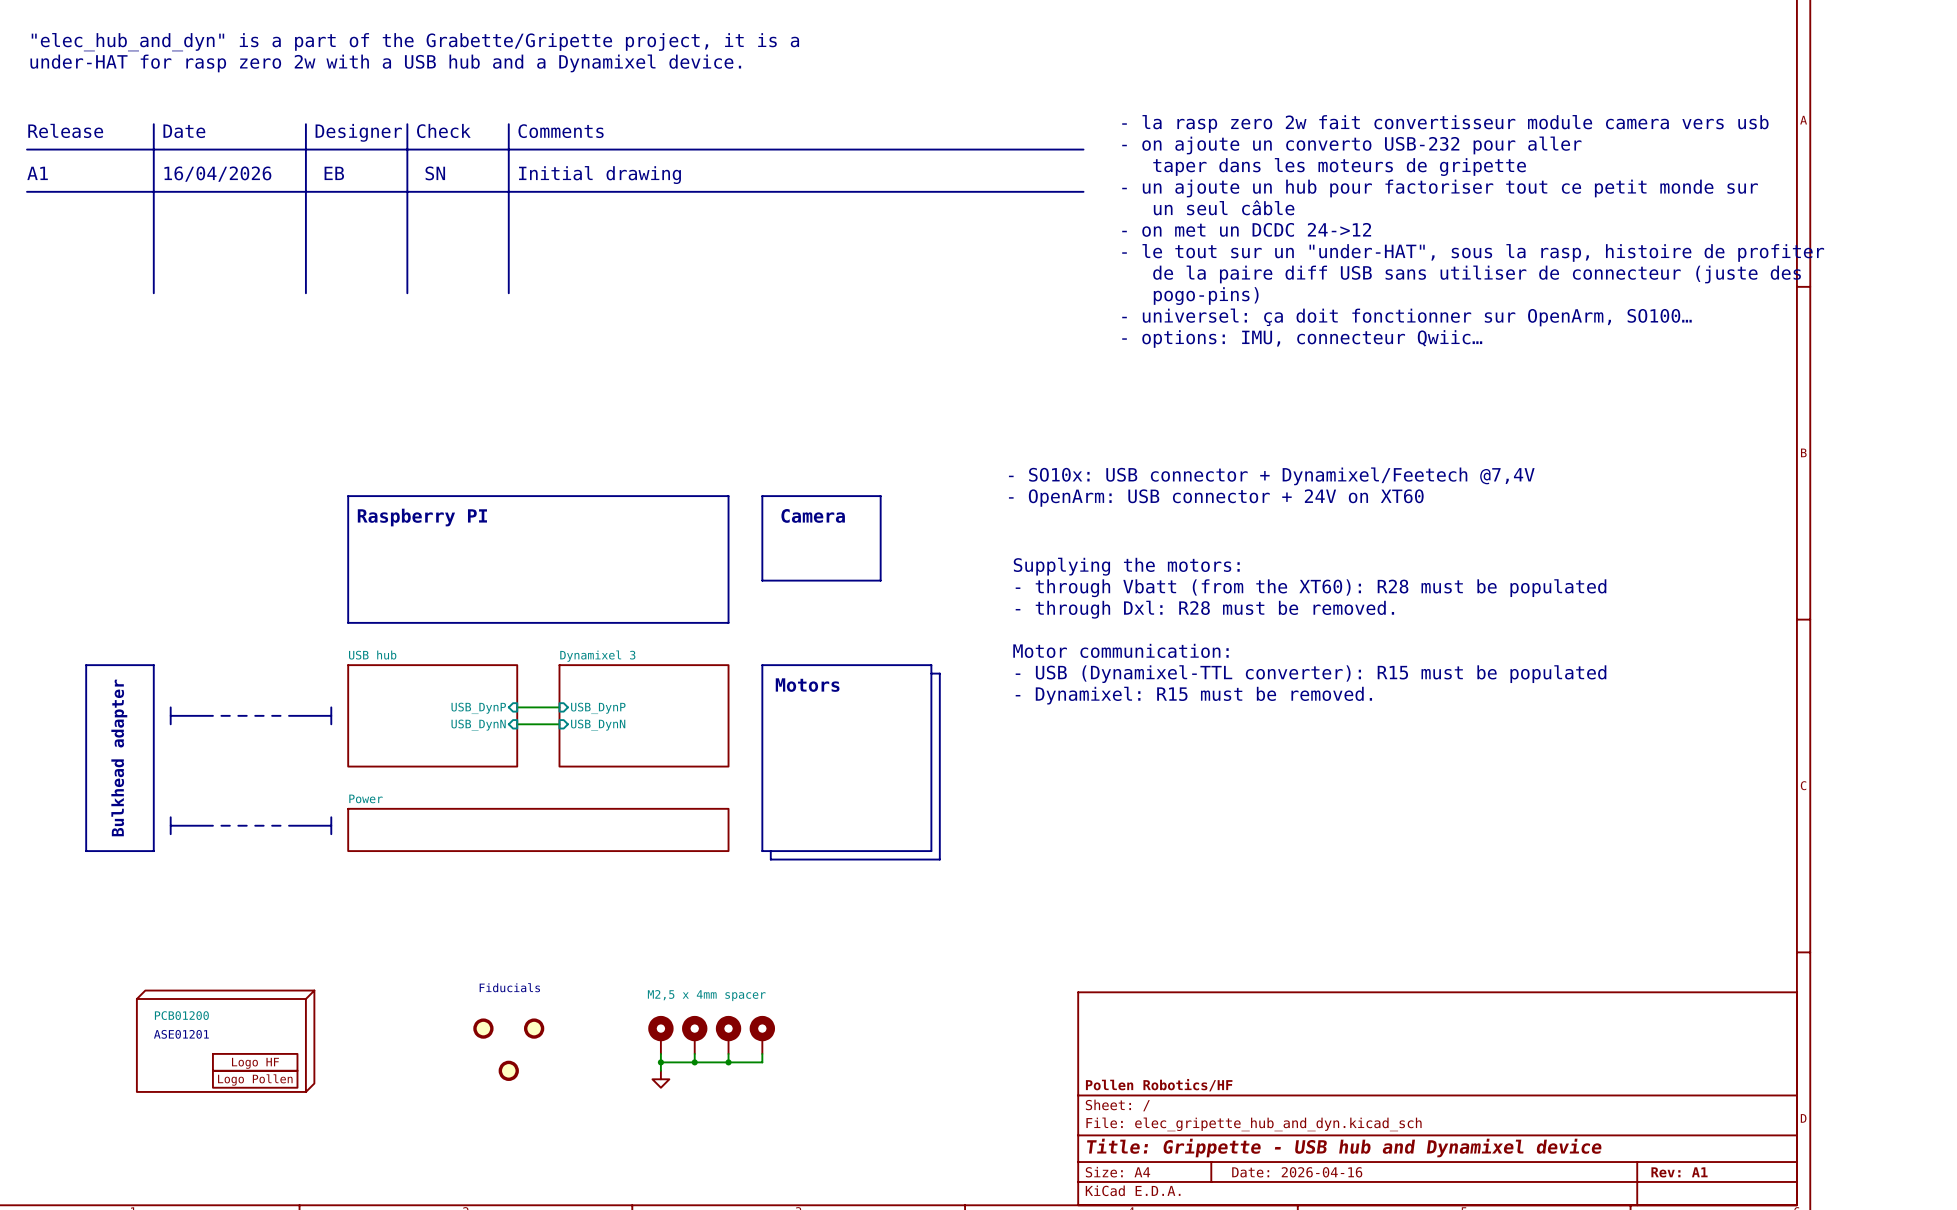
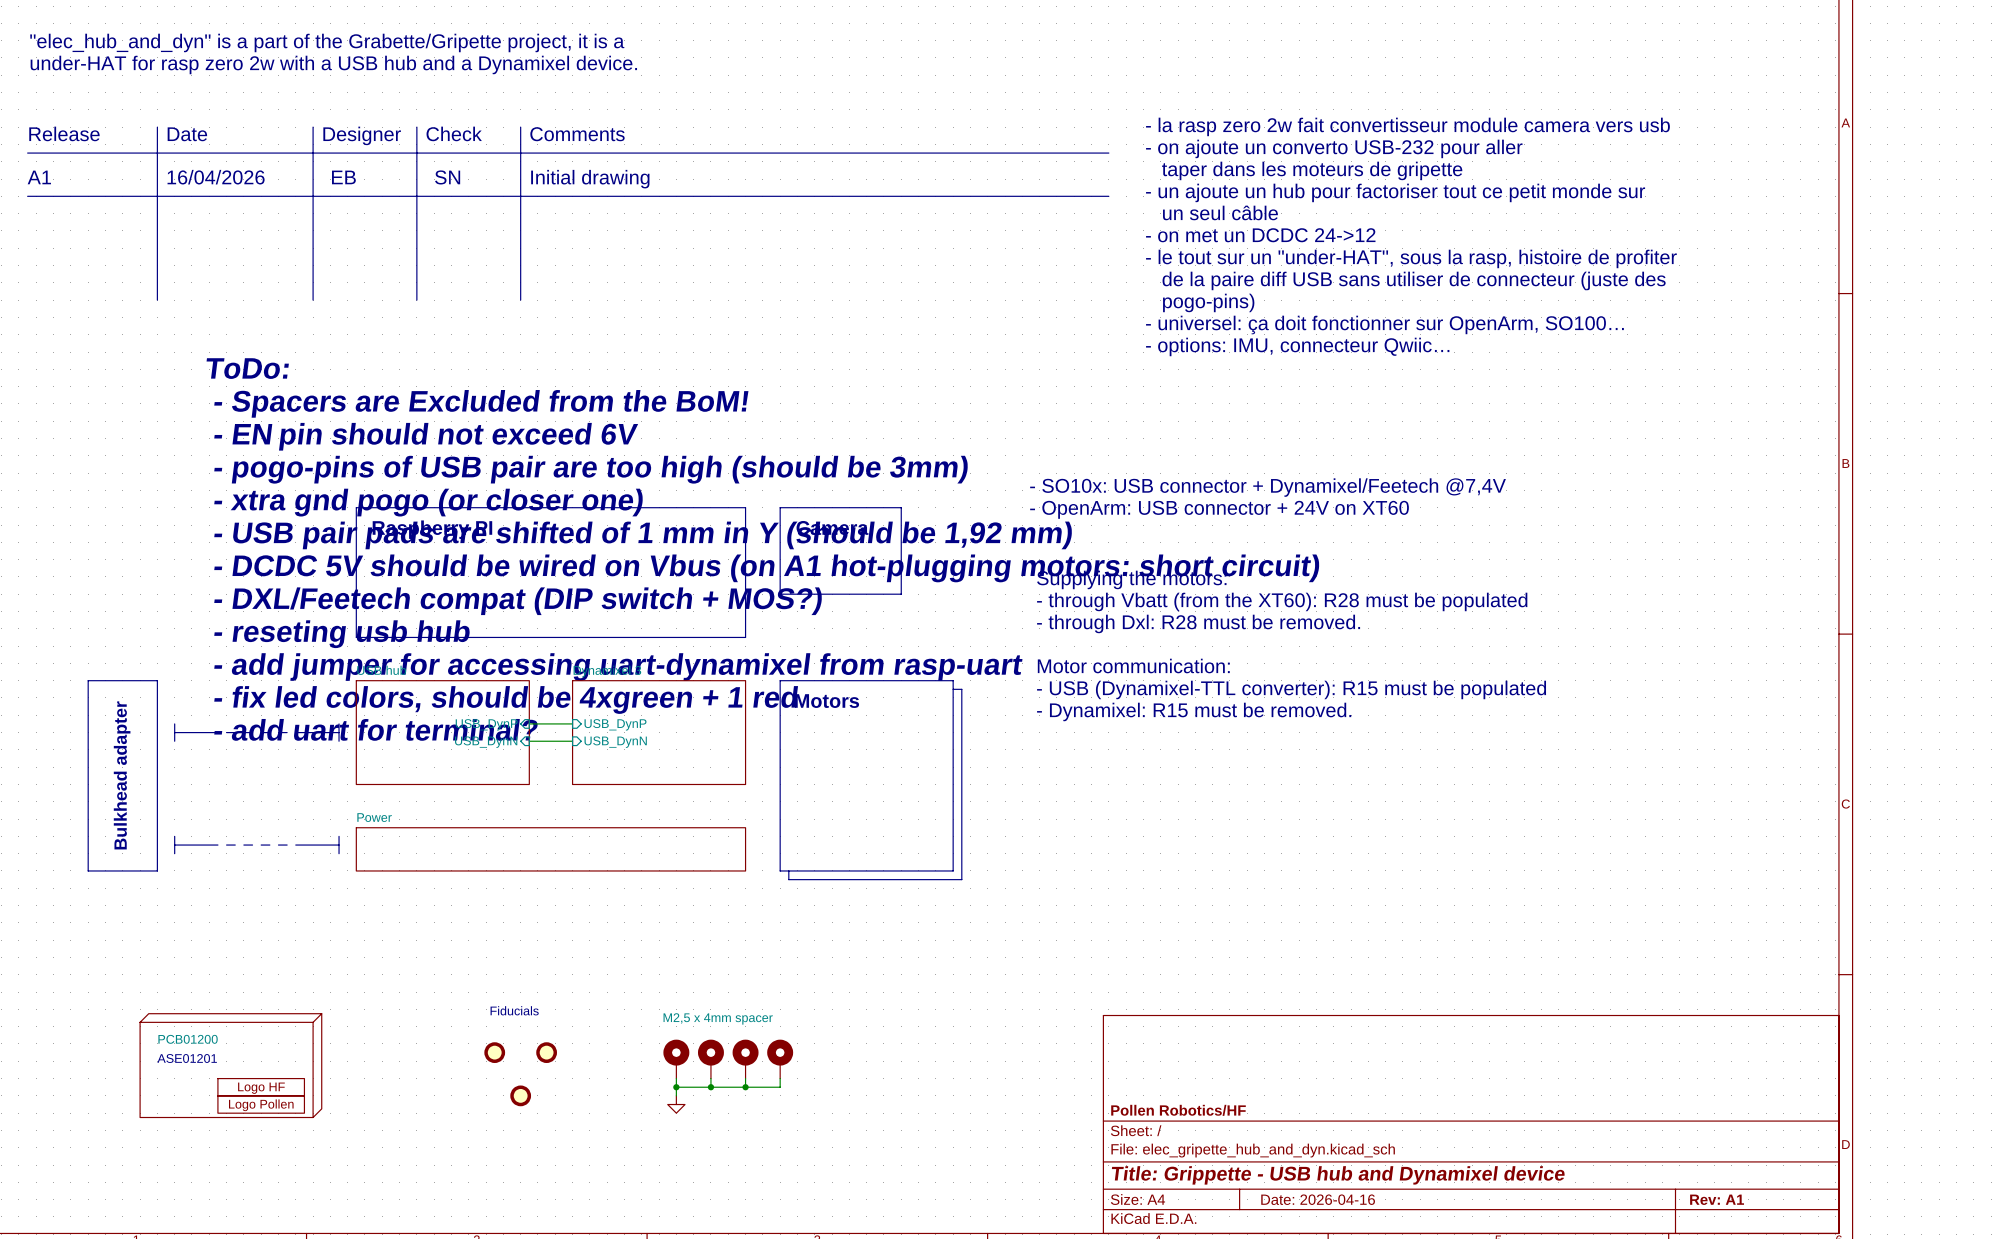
text: none -> ToDo: (247, 368)
text: none -> - Spacers are Excluded from the BoM! (481, 403)
text: none -> - EN pin should not exceed 6V (426, 436)
text: none -> - pogo-pins of USB pair are too high (should be 3mm) (591, 469)
text: none -> - xtra gnd pogo (or closer one) (428, 502)
text: none -> - USB pair pads are shifted of 1 mm in Y (should be 1,92 mm) (643, 535)
text: none -> - DCDC 5V should be wired on Vbus (on A1 hot-plugging motors: short circuit) (766, 568)
text: none -> - DXL/Feetech compat (DIP switch + MOS?) (518, 601)
text: none -> - reseting usb hub (342, 634)
text: none -> - add jumper for accessing uart-dynamixel from rasp-uart (618, 667)
text: none -> - fix led colors, should be 4xgreen + 1 red (506, 699)
text: none -> - add uart for terminal? (376, 729)

